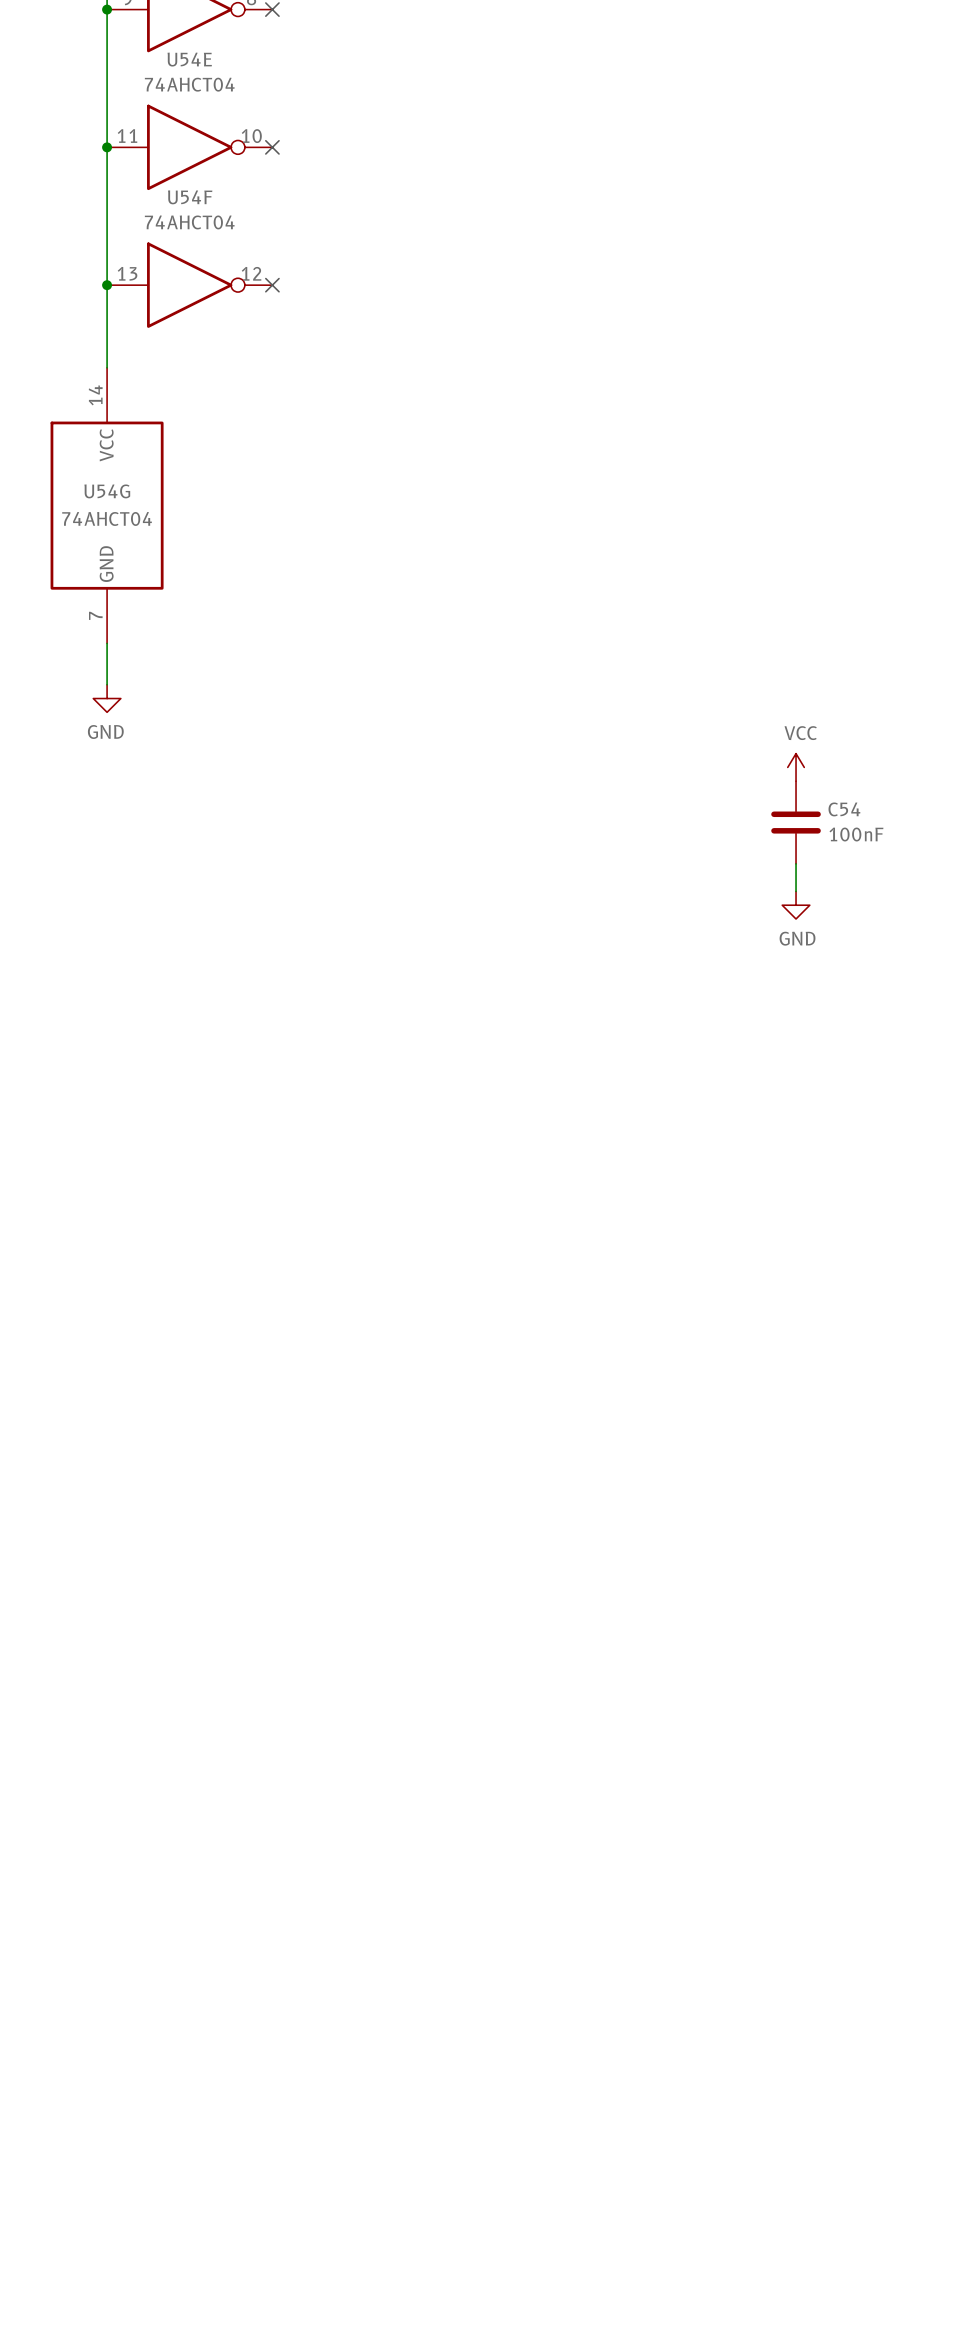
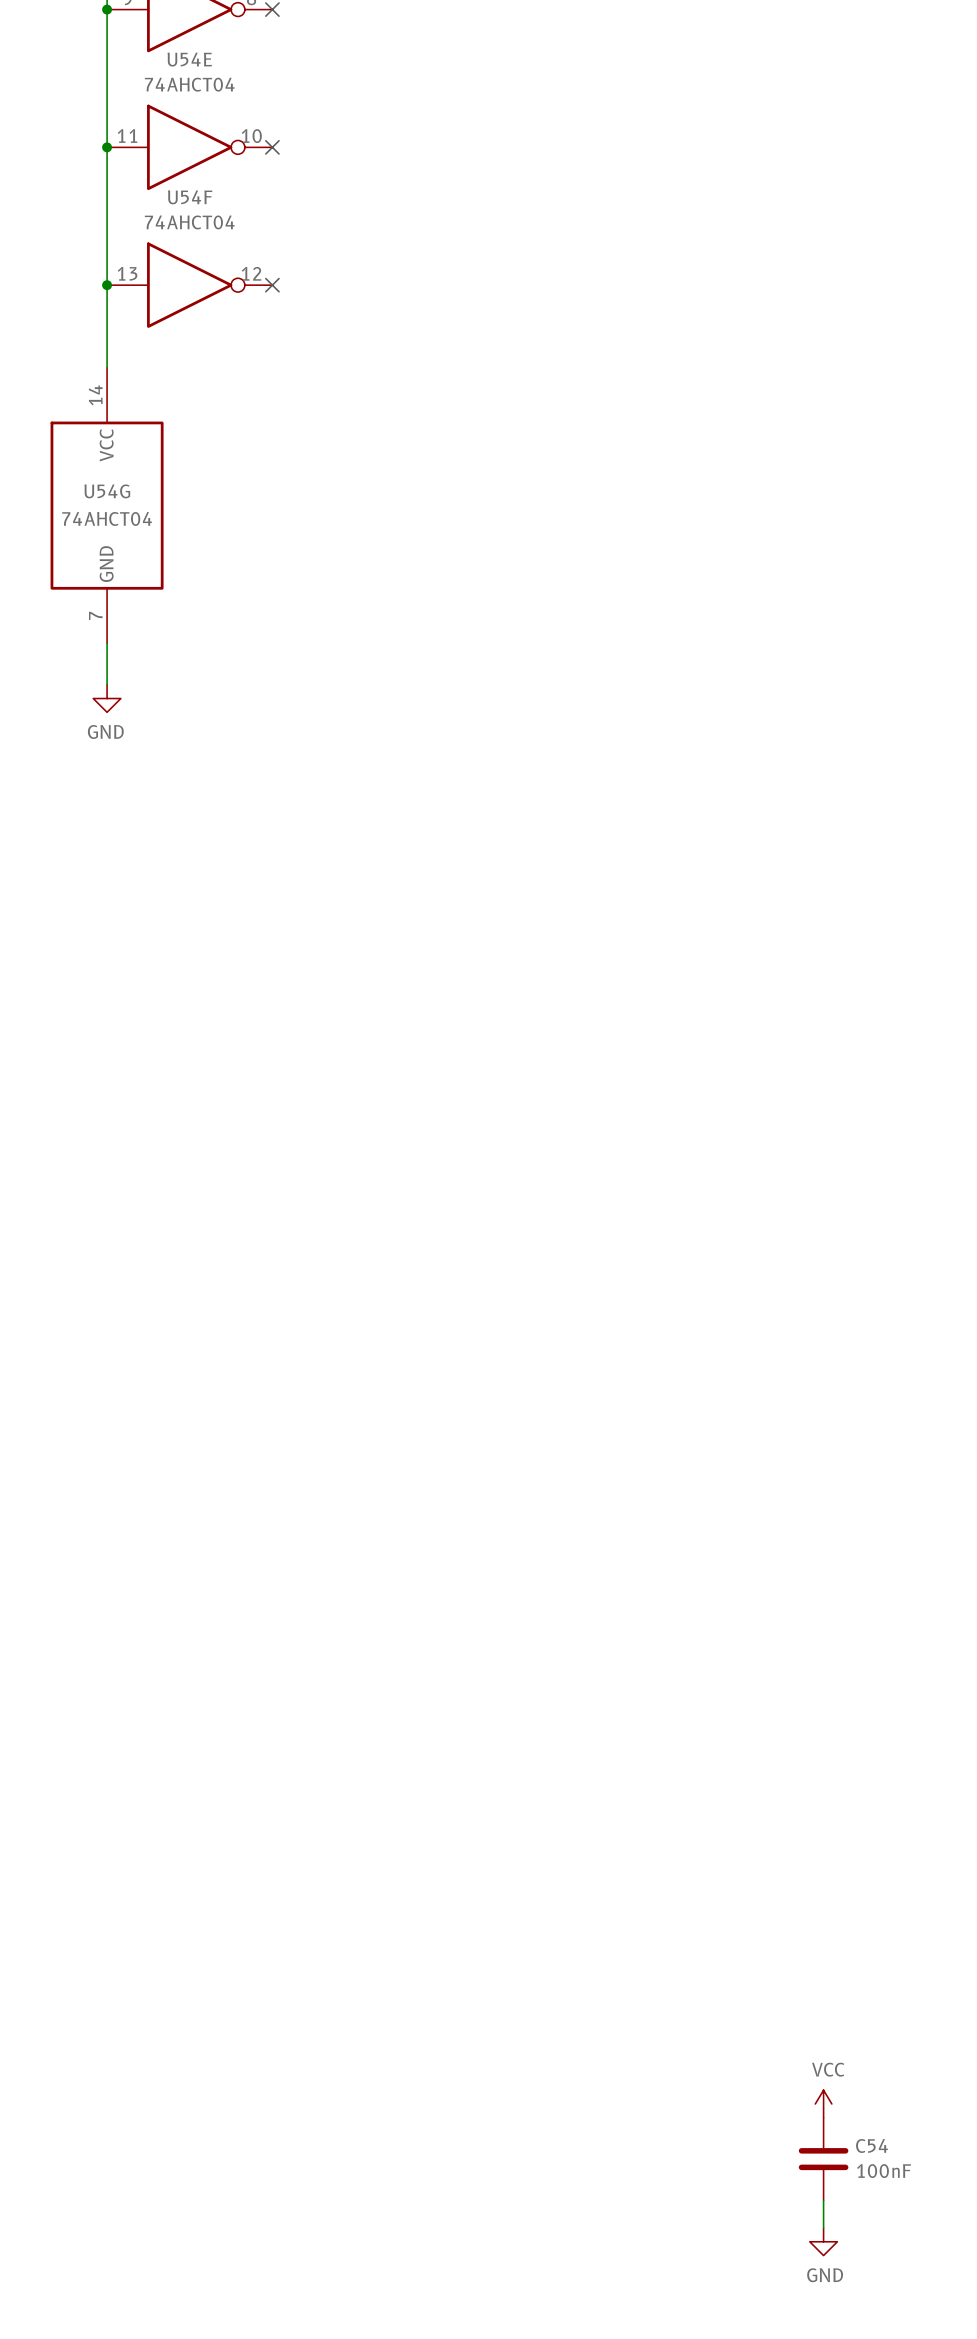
power symbol: VCC (796, 767) -> none
C54 position: (796, 822) -> (823, 2159)
wire: (796, 863) (796, 891) -> none
power symbol: GND (796, 905) -> none
power symbol: none -> VCC (823, 2103)
wire: none -> (823, 2200) (823, 2228)
power symbol: none -> GND (823, 2241)

